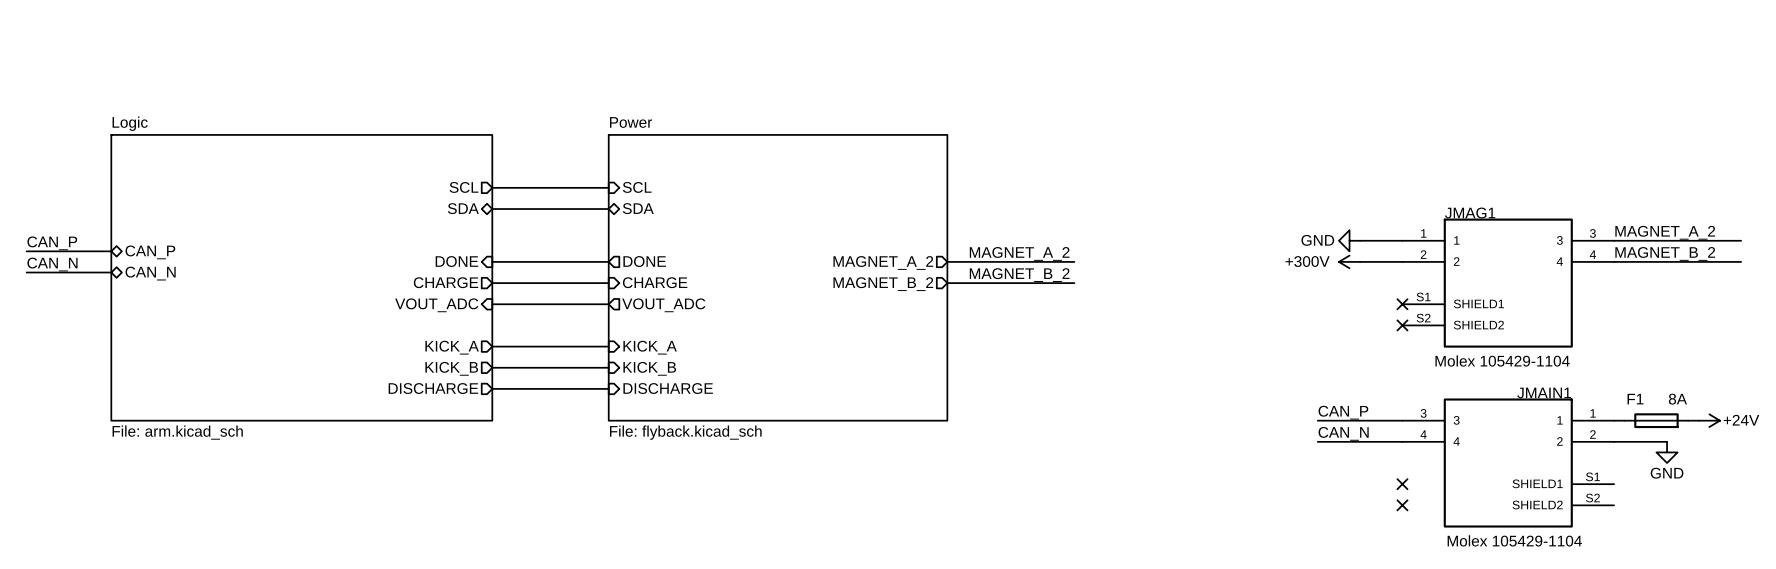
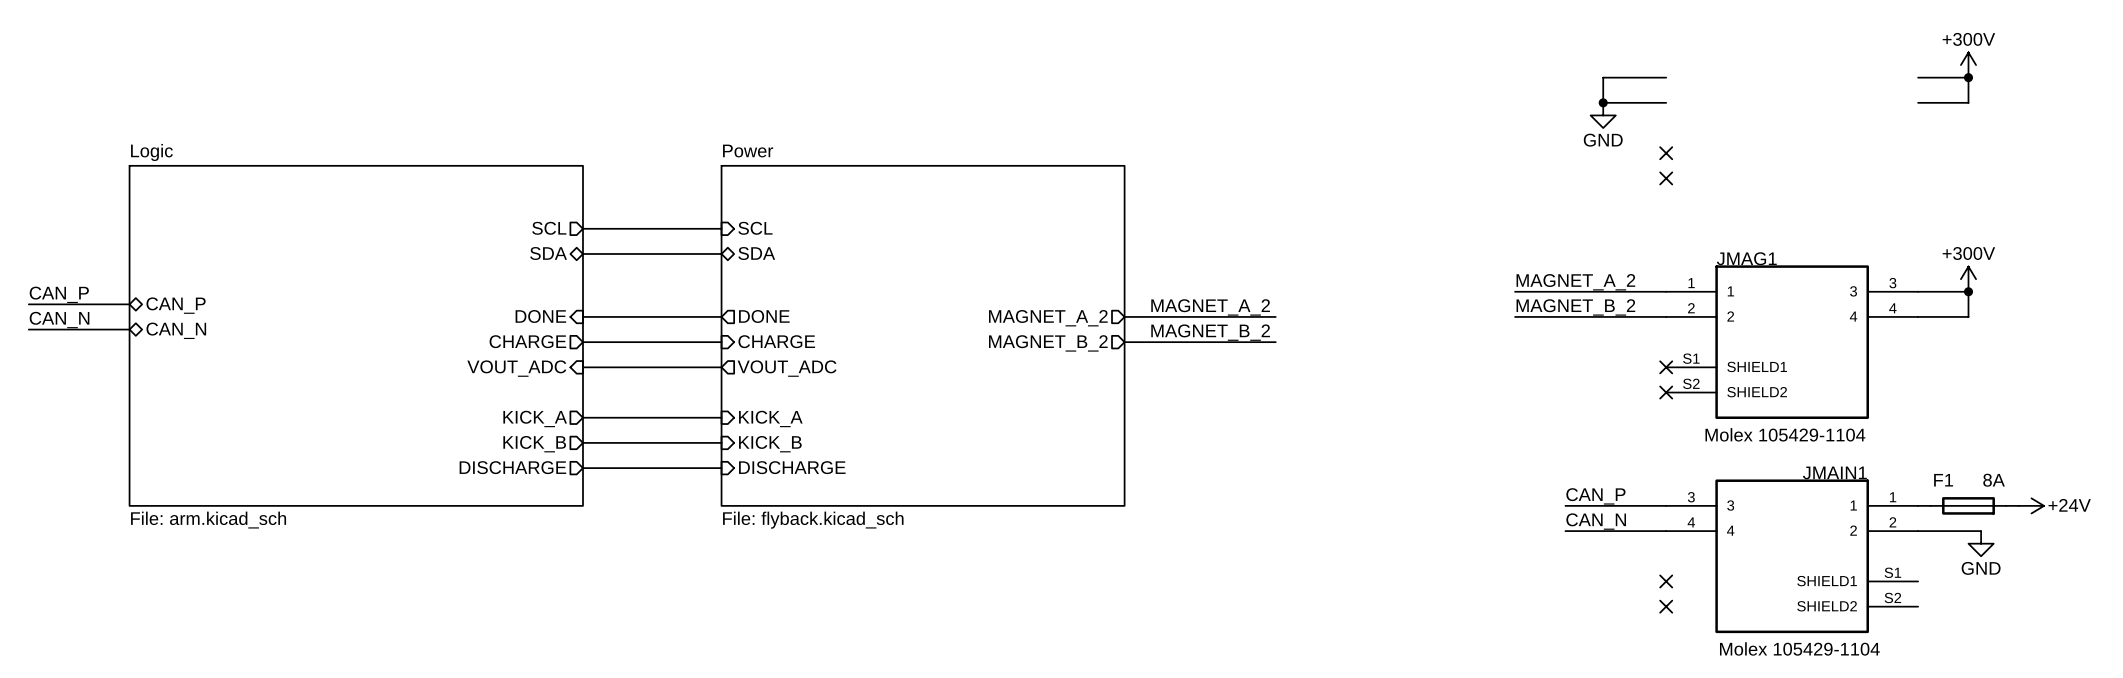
power symbol: none -> +300V (1968, 65)
wire: none -> (1666, 77) (1603, 77) (1603, 102) (1666, 102)
wire: none -> (1918, 77) (1968, 77) (1968, 102) (1918, 102)
junction: none -> (1968, 77)
junction: none -> (1603, 102)
no-connect mark: none -> (1666, 153)
no-connect mark: none -> (1666, 178)
power symbol: none -> +300V (1968, 279)
label: none -> MAGNET_A_2 (1575, 282)
label: MAGNET_A_2 (1665, 232) -> none
wire: none -> (1515, 291) (1615, 291)
power symbol rotation: 0° (1349, 240) -> 90° counterclockwise (1603, 115)
power symbol position: GND (1349, 240) -> GND (1603, 115)
wire: (1656, 240) (1741, 240) -> (1968, 291) (1968, 316)
junction: none -> (1968, 291)
label: none -> MAGNET_B_2 (1575, 307)
label: MAGNET_B_2 (1665, 253) -> none
wire: none -> (1515, 316) (1615, 316)
power symbol: +300V (1349, 261) -> none
wire: (1656, 261) (1741, 261) -> none

